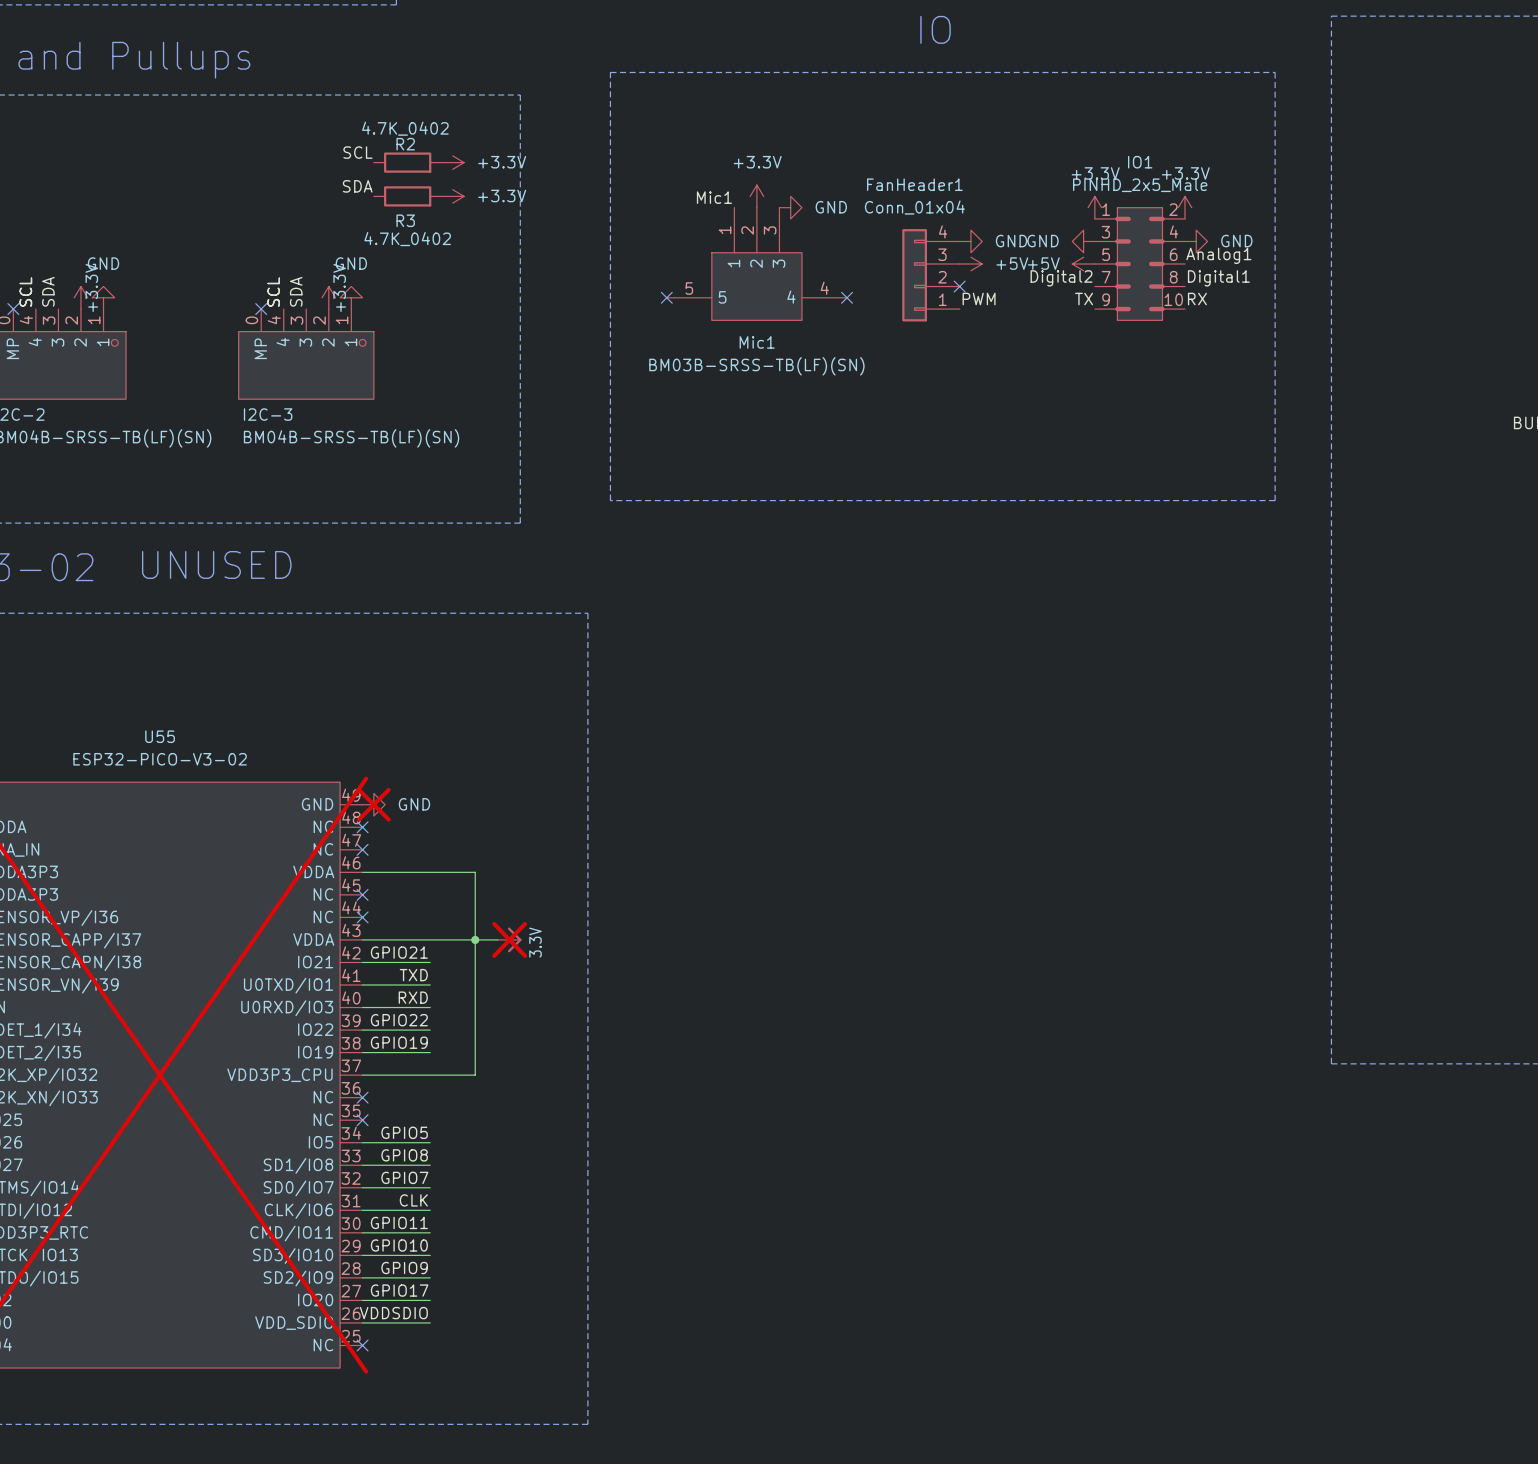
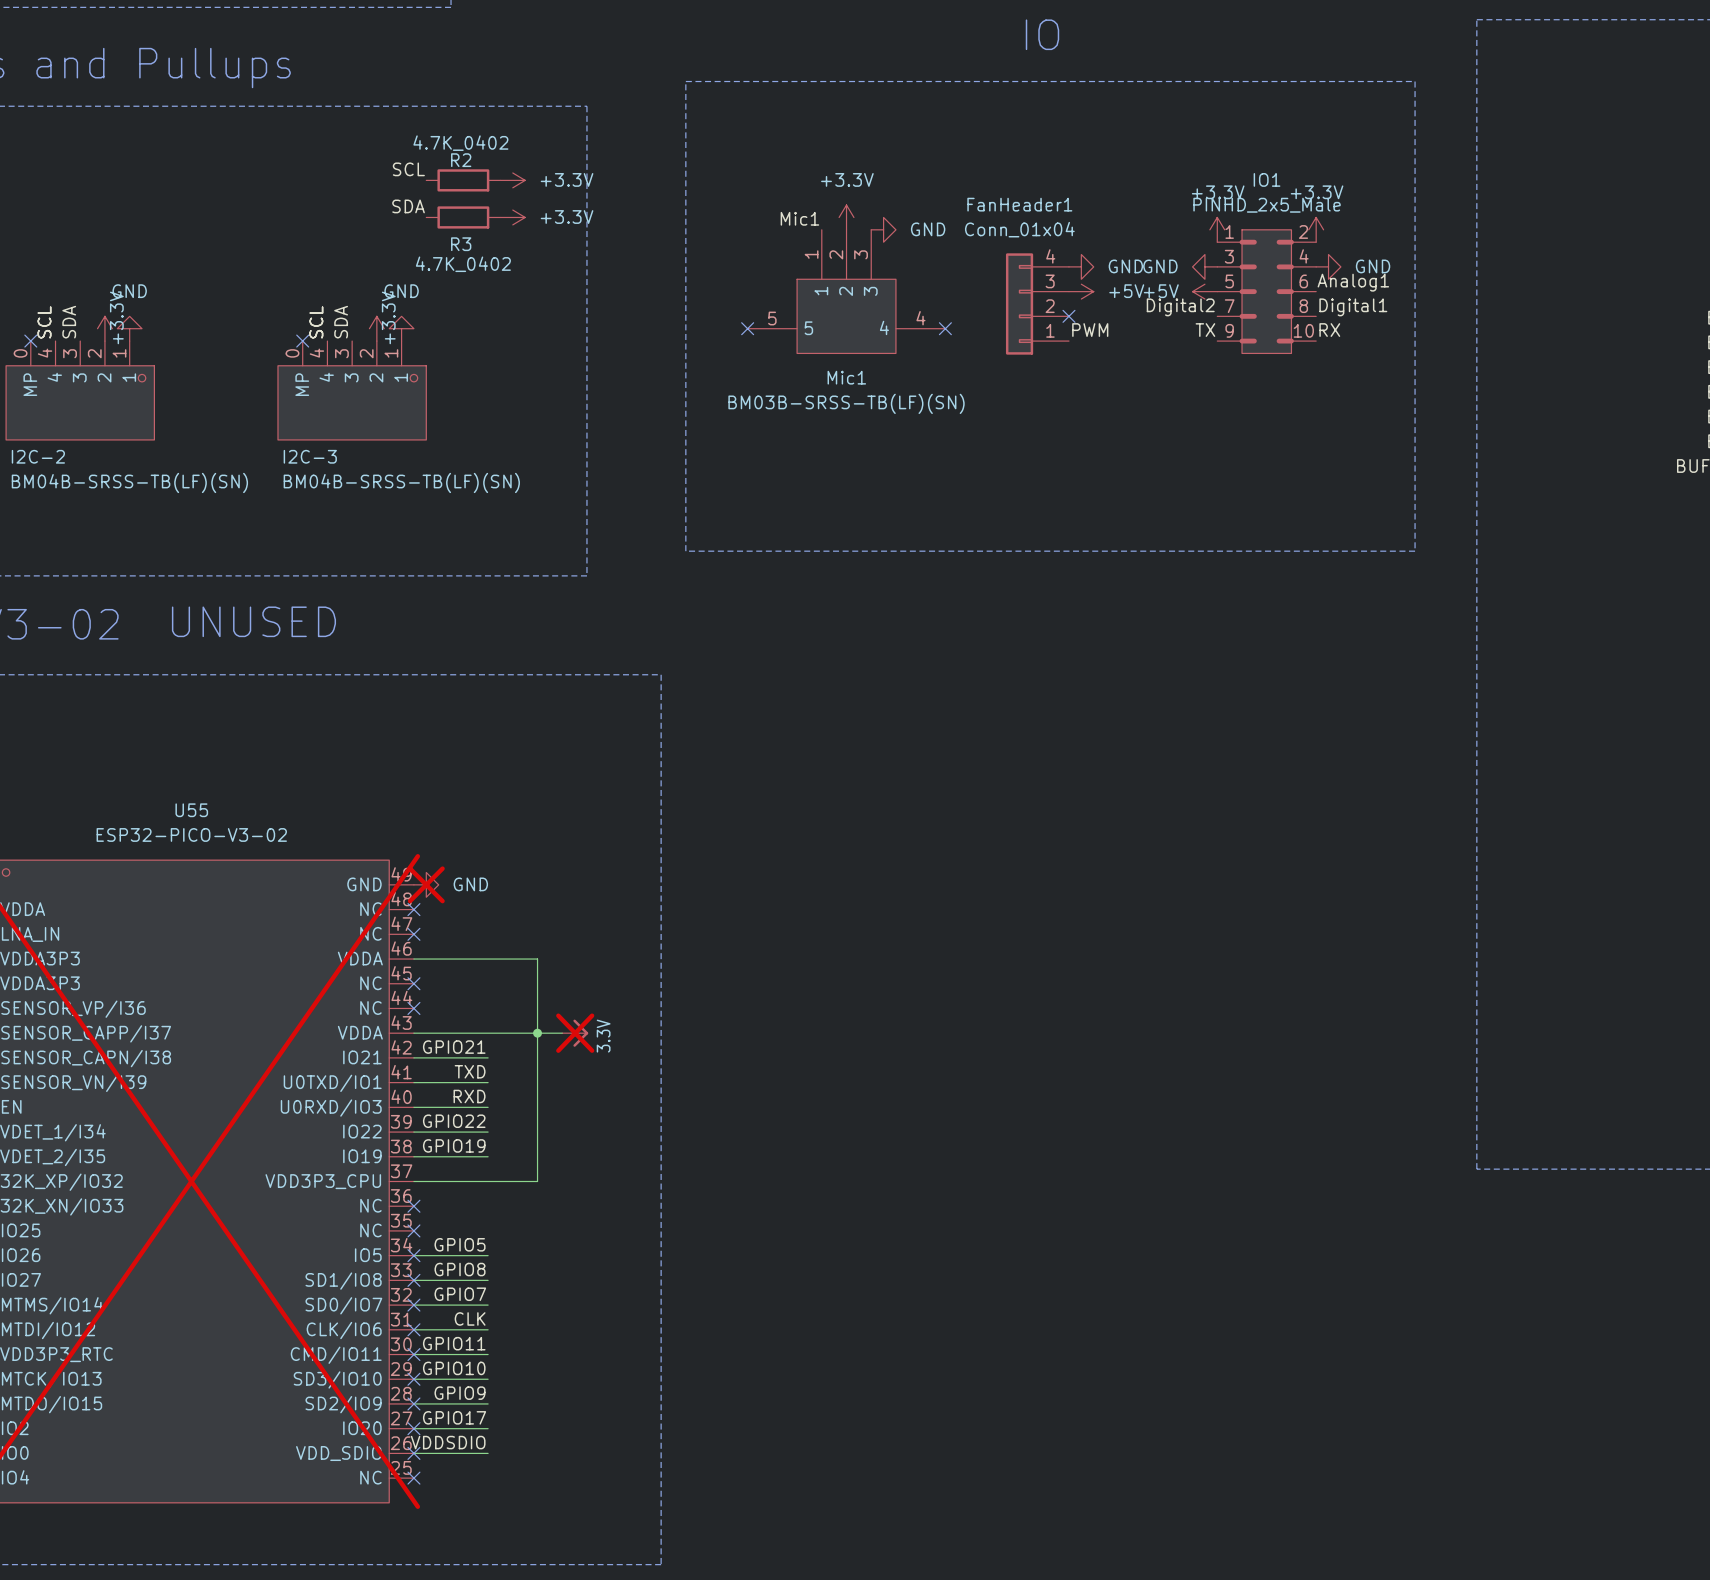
no-connect mark: none -> (413, 1255)
no-connect mark: none -> (413, 1280)
no-connect mark: none -> (413, 1305)
no-connect mark: none -> (413, 1329)
no-connect mark: none -> (413, 1354)
no-connect mark: none -> (413, 1379)
no-connect mark: none -> (413, 1403)
no-connect mark: none -> (413, 1428)
no-connect mark: none -> (413, 1453)

